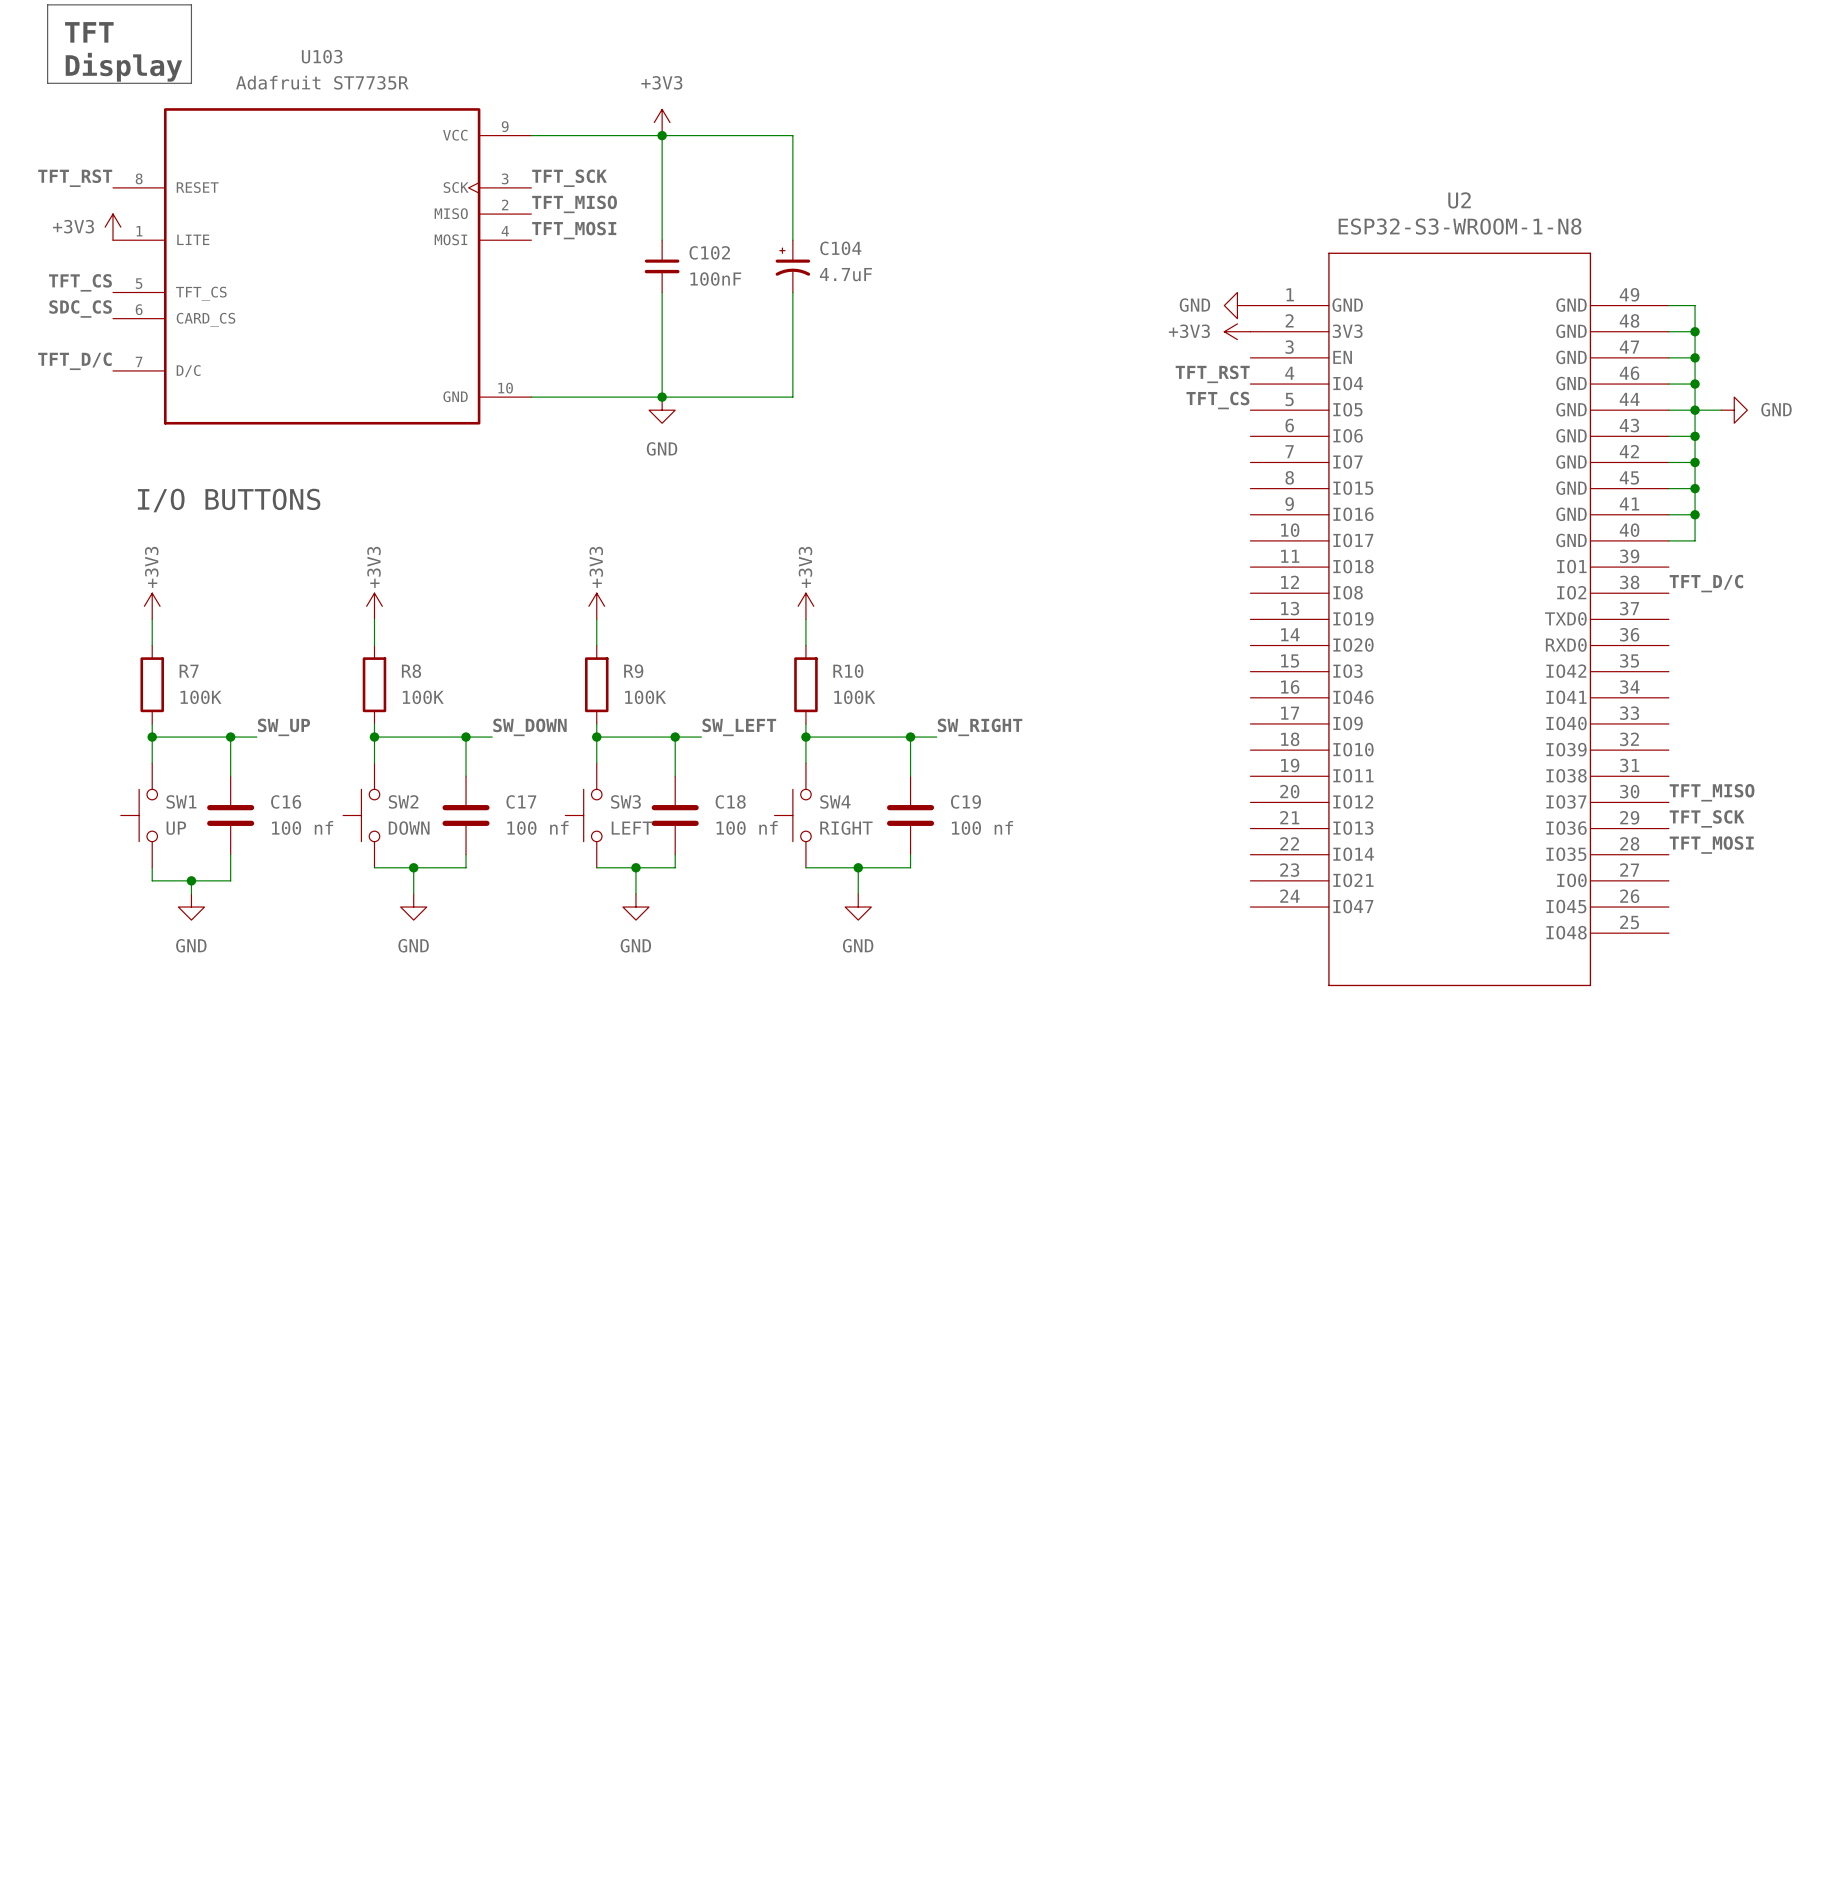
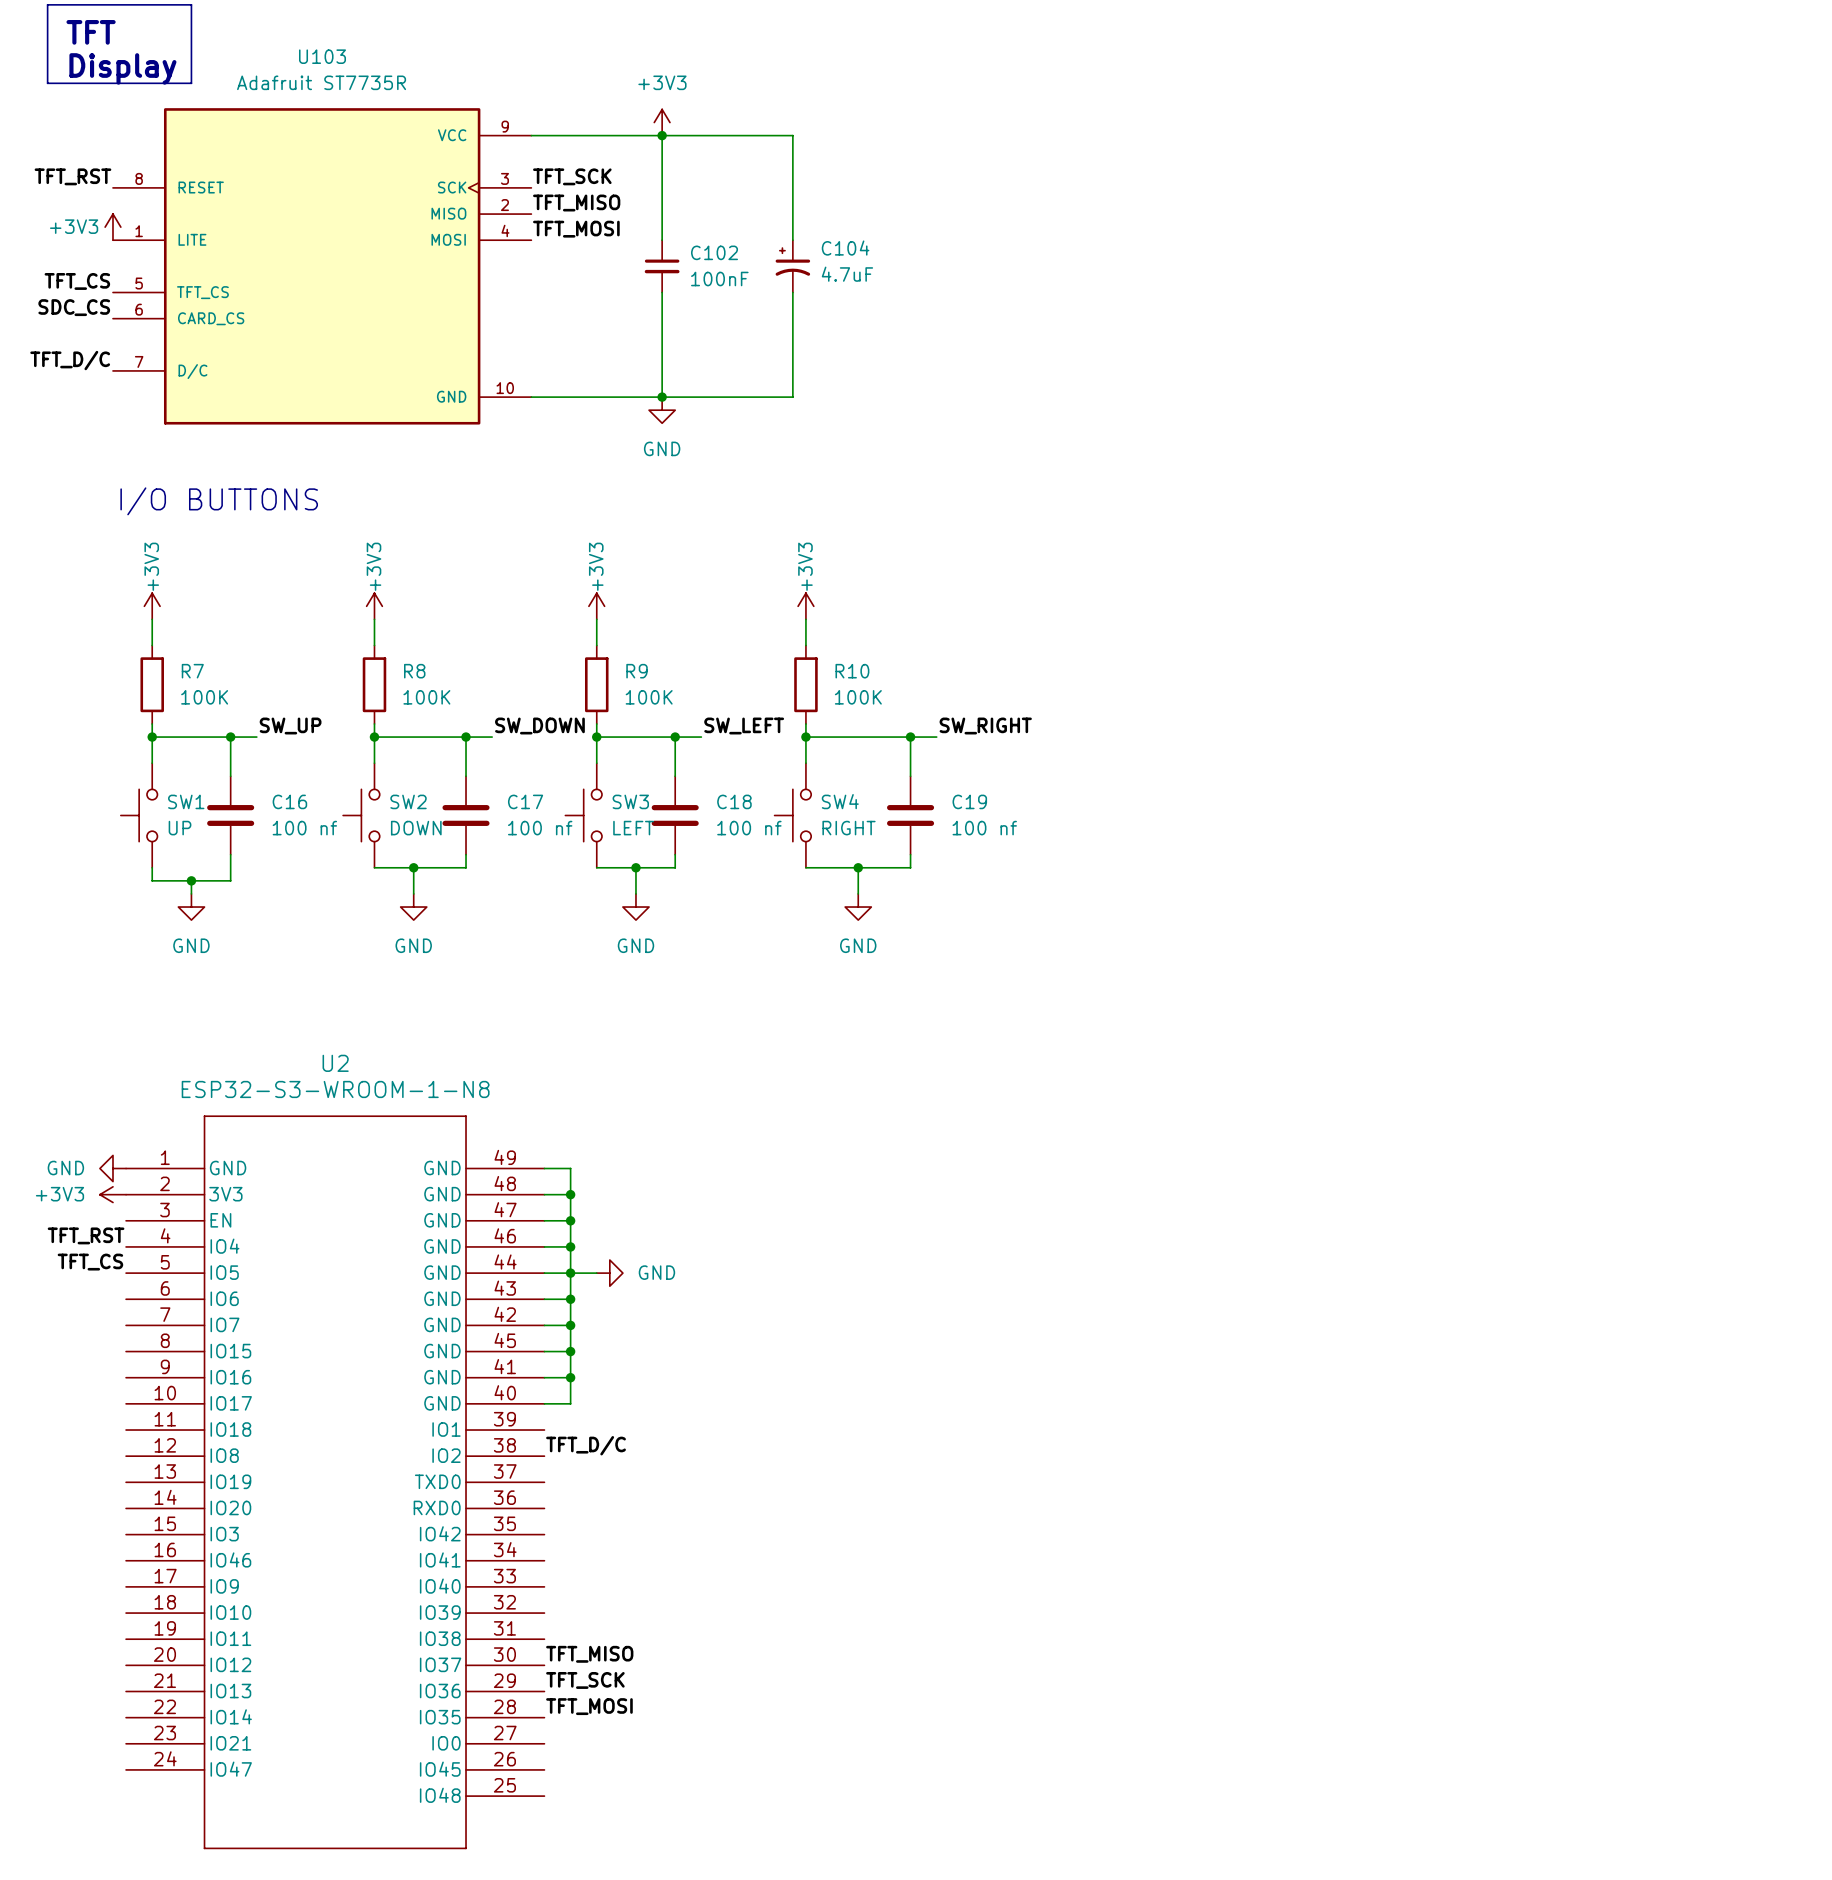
power symbol: GND (1237, 305) -> none
wire: (1668, 305) (1695, 305) (1695, 540) (1668, 540) -> none
power symbol: +3V3 (1237, 331) -> none
wire: (1668, 331) (1695, 331) -> none
junction: (1695, 331) -> none
wire: (1668, 357) (1695, 357) -> none
junction: (1695, 357) -> none
label: TFT_RST (1212, 374) -> none
wire: (1668, 384) (1695, 384) -> none
junction: (1695, 384) -> none
label: TFT_CS (1217, 400) -> none
wire: (1668, 410) (1721, 410) -> none
junction: (1695, 410) -> none
power symbol: GND (1734, 410) -> none
wire: (1668, 436) (1695, 436) -> none
junction: (1695, 436) -> none
wire: (1668, 462) (1695, 462) -> none
junction: (1695, 462) -> none
wire: (1668, 488) (1695, 488) -> none
junction: (1695, 488) -> none
wire: (1668, 514) (1695, 514) -> none
junction: (1695, 514) -> none
label: TFT_D/C (1706, 583) -> none
U2 position: (1459, 619) -> (335, 1482)
label: TFT_MISO (1712, 792) -> none
label: TFT_SCK (1707, 818) -> none
label: TFT_MOSI (1711, 845) -> none
power symbol: none -> GND (112, 1168)
wire: none -> (544, 1168) (570, 1168) (570, 1403) (544, 1403)
power symbol: none -> +3V3 (112, 1194)
wire: none -> (544, 1194) (570, 1194)
junction: none -> (570, 1194)
wire: none -> (544, 1220) (570, 1220)
junction: none -> (570, 1220)
label: none -> TFT_RST (86, 1235)
wire: none -> (544, 1246) (570, 1246)
junction: none -> (570, 1246)
label: none -> TFT_CS (90, 1262)
wire: none -> (544, 1273) (596, 1273)
junction: none -> (570, 1273)
power symbol: none -> GND (609, 1273)
wire: none -> (544, 1299) (570, 1299)
junction: none -> (570, 1299)
wire: none -> (544, 1325) (570, 1325)
junction: none -> (570, 1325)
wire: none -> (544, 1351) (570, 1351)
junction: none -> (570, 1351)
wire: none -> (544, 1377) (570, 1377)
junction: none -> (570, 1377)
label: none -> TFT_D/C (586, 1445)
label: none -> TFT_MISO (589, 1654)
label: none -> TFT_SCK (585, 1680)
label: none -> TFT_MOSI (589, 1706)

